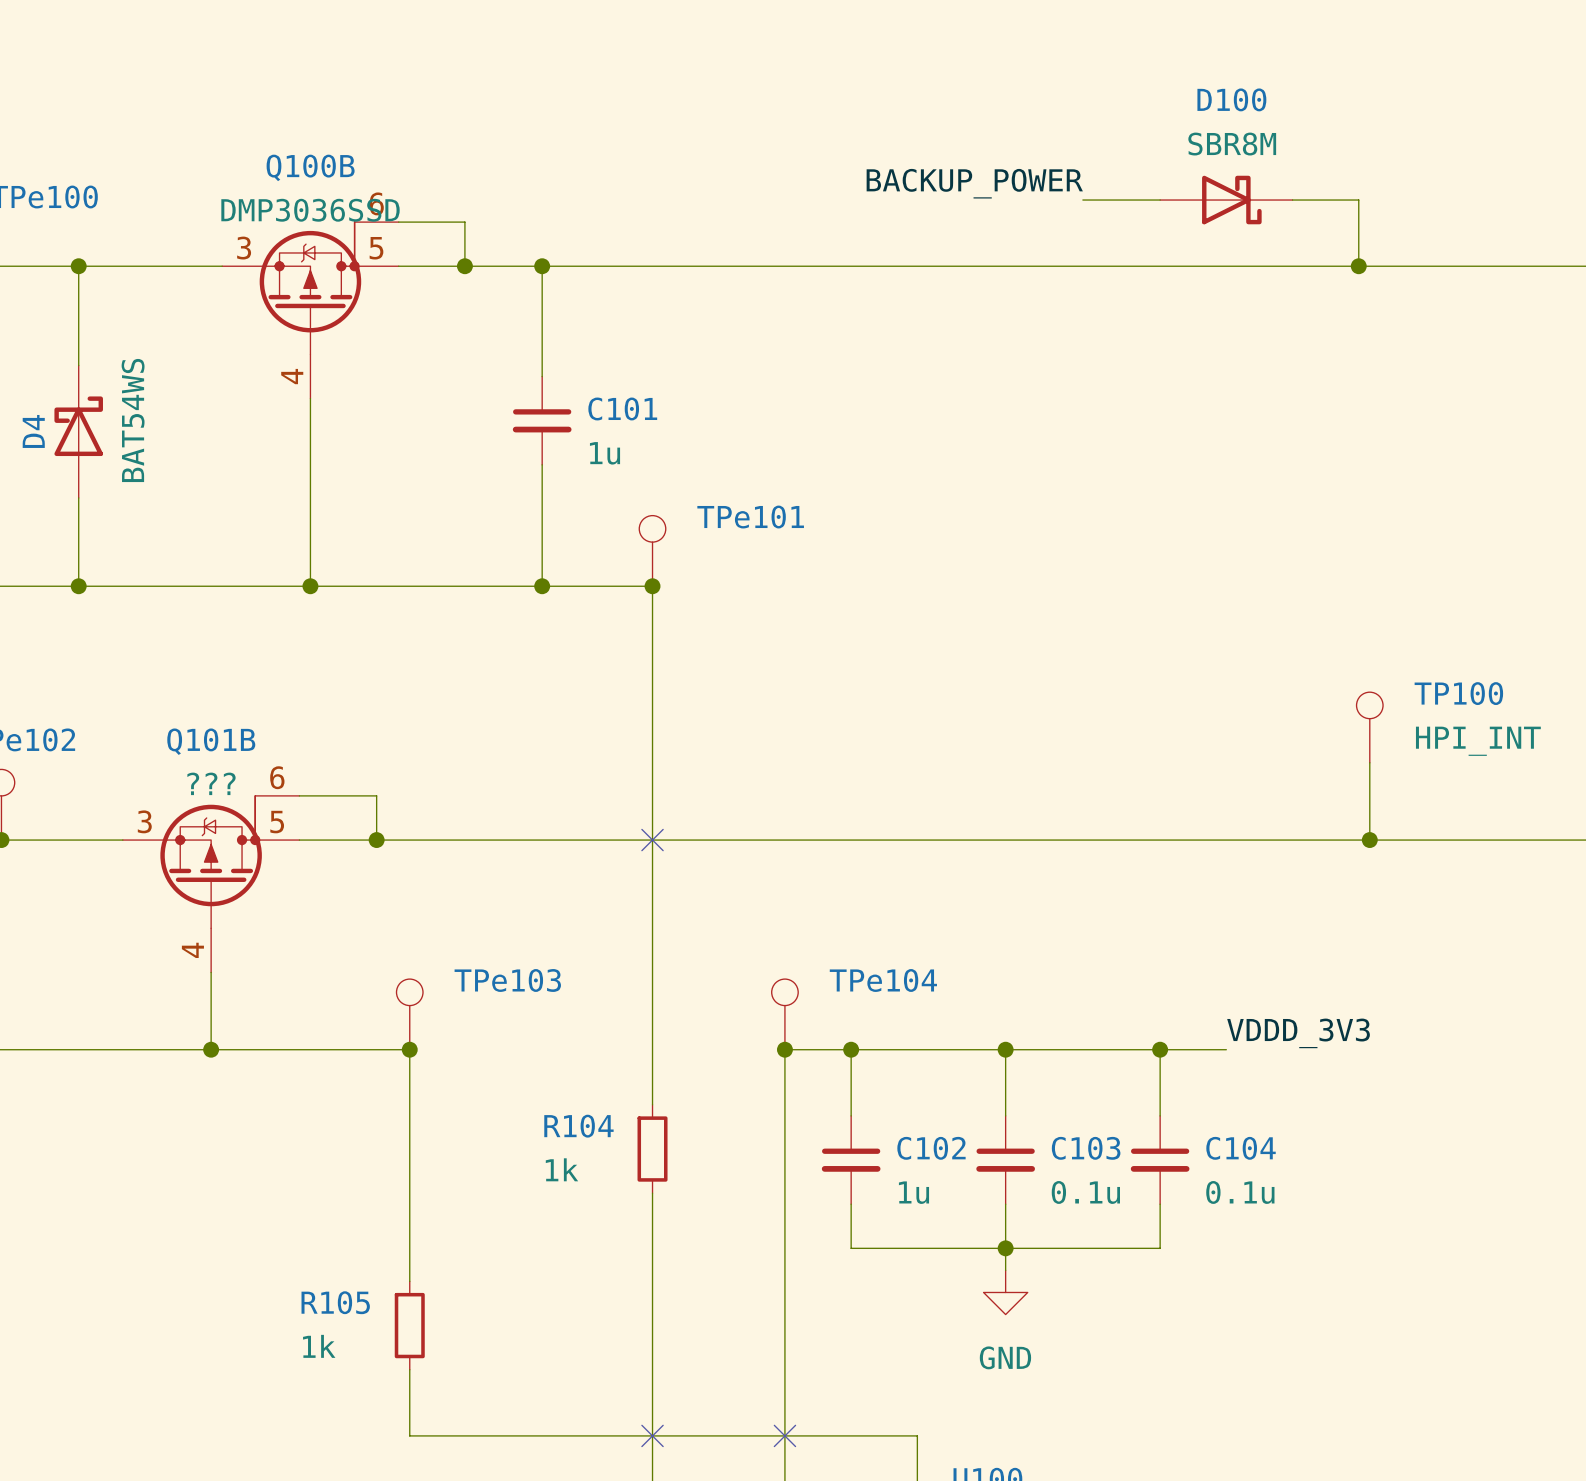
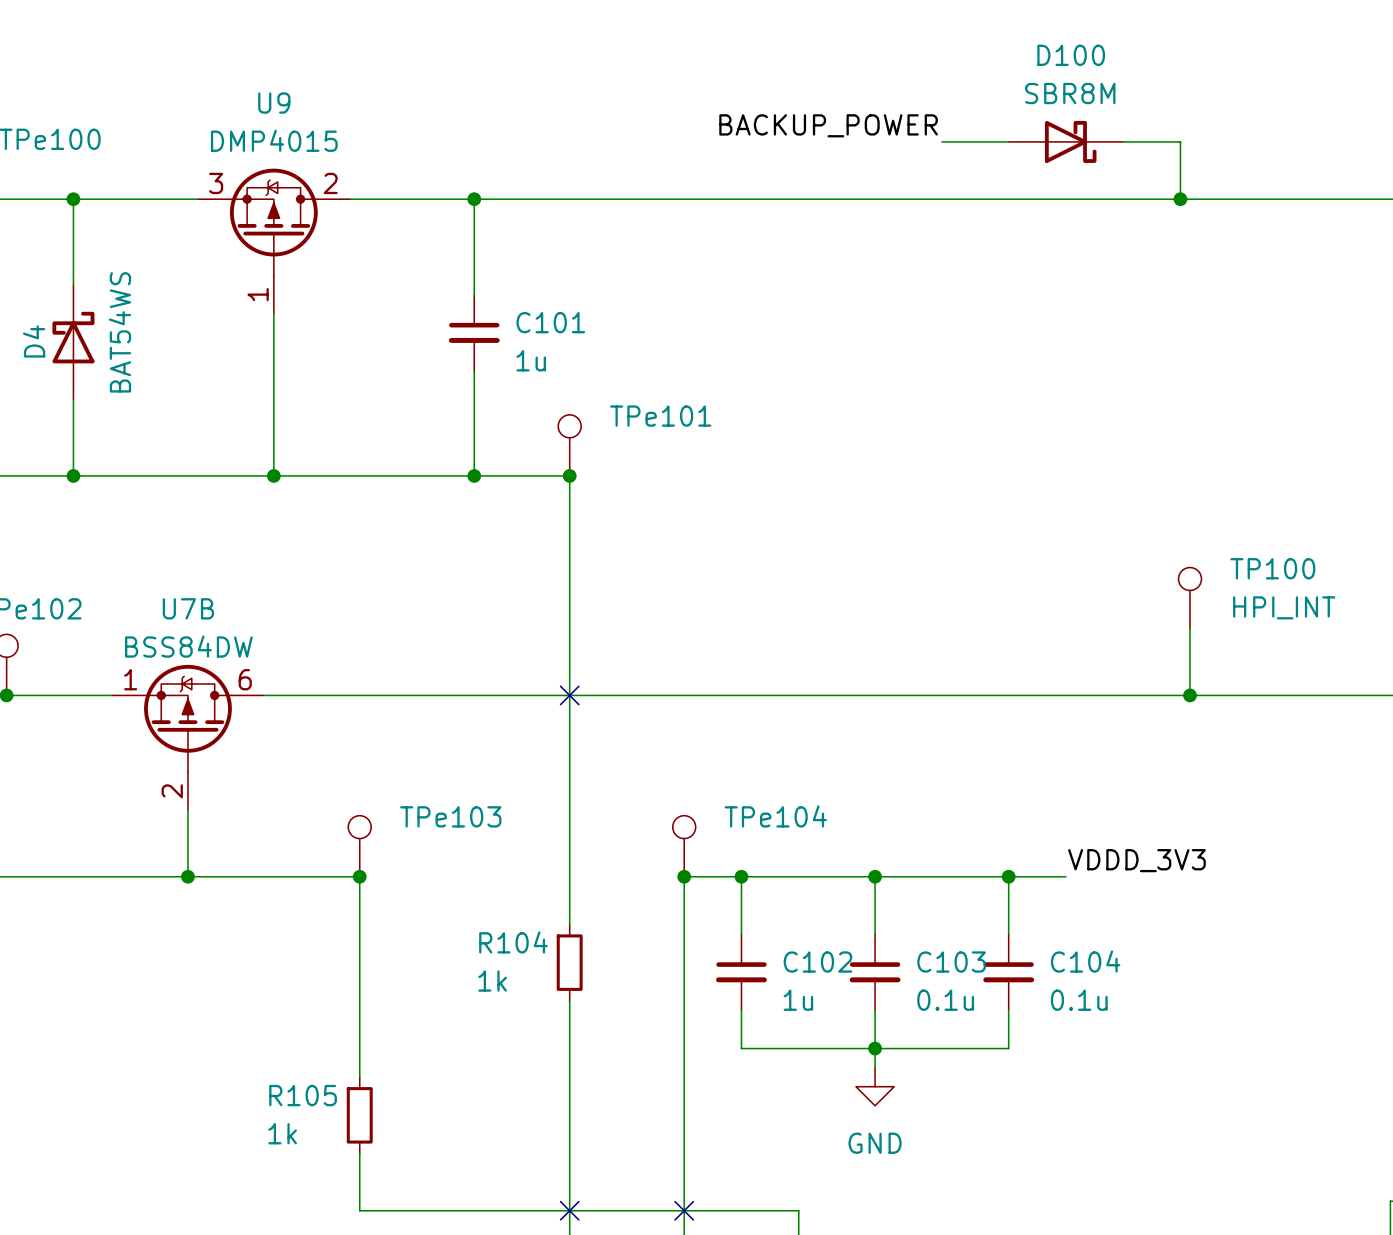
wire: (398, 222) (464, 222) (464, 266) -> none
junction: (464, 266) -> none
Q100B: DMP3036SSD (310, 310) -> none
U9: none -> DMP4015 (273, 241)
wire: (299, 795) (376, 795) (376, 840) -> none
junction: (376, 840) -> none
Q101B: ??? (211, 884) -> none
U7B: none -> BSS84DW (187, 737)

